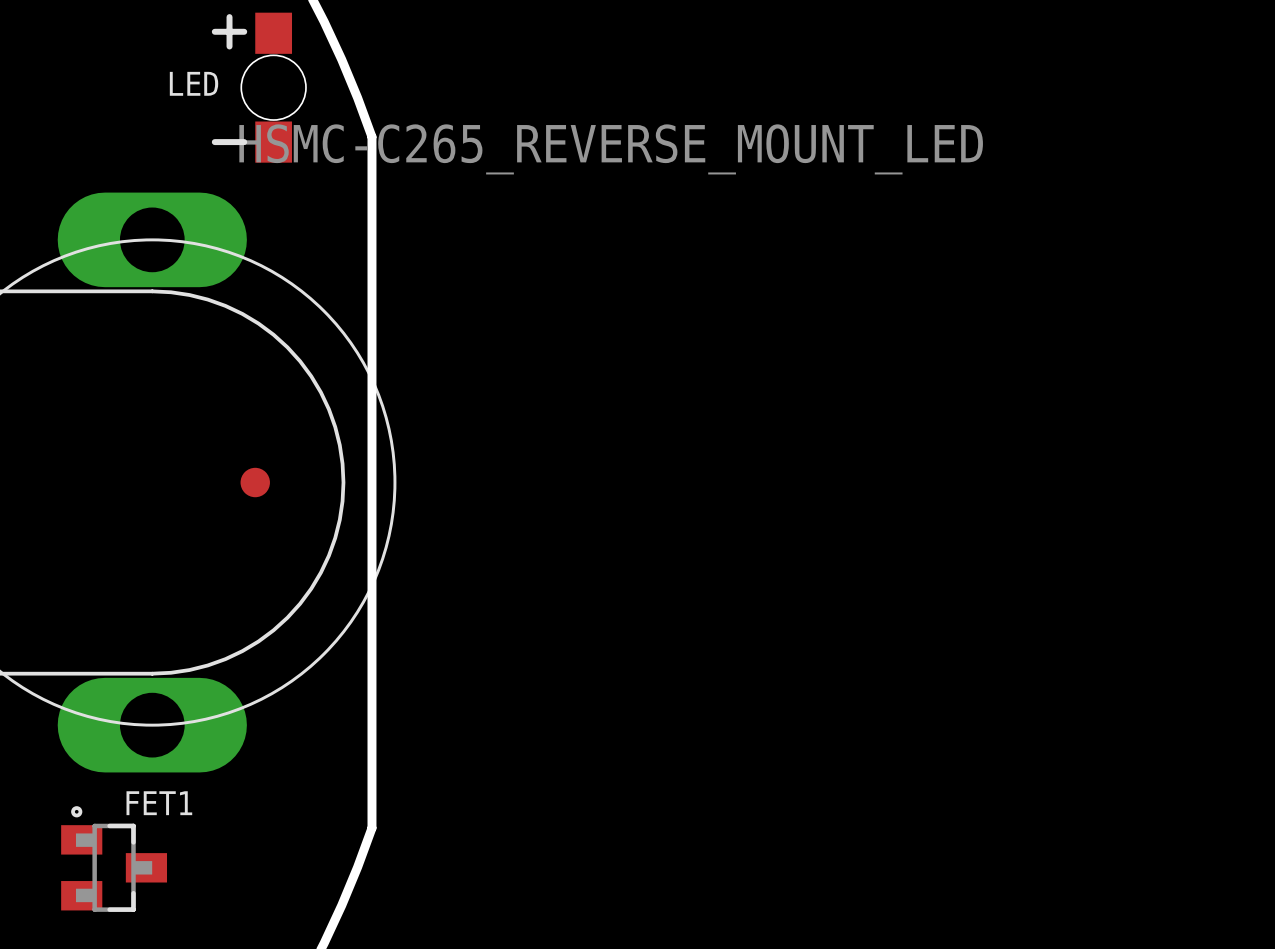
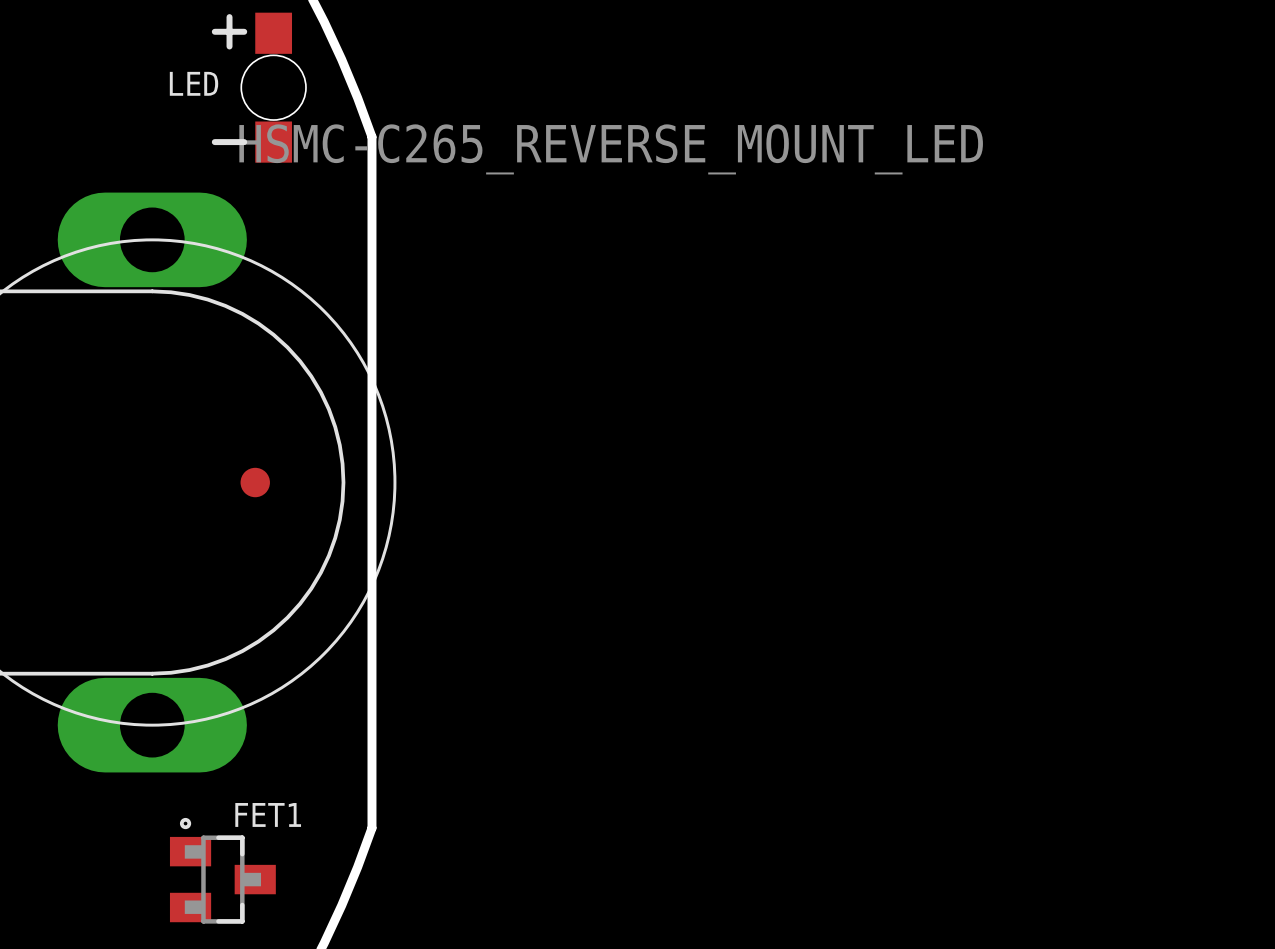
FET1 position: (114, 859) -> (222, 870)

